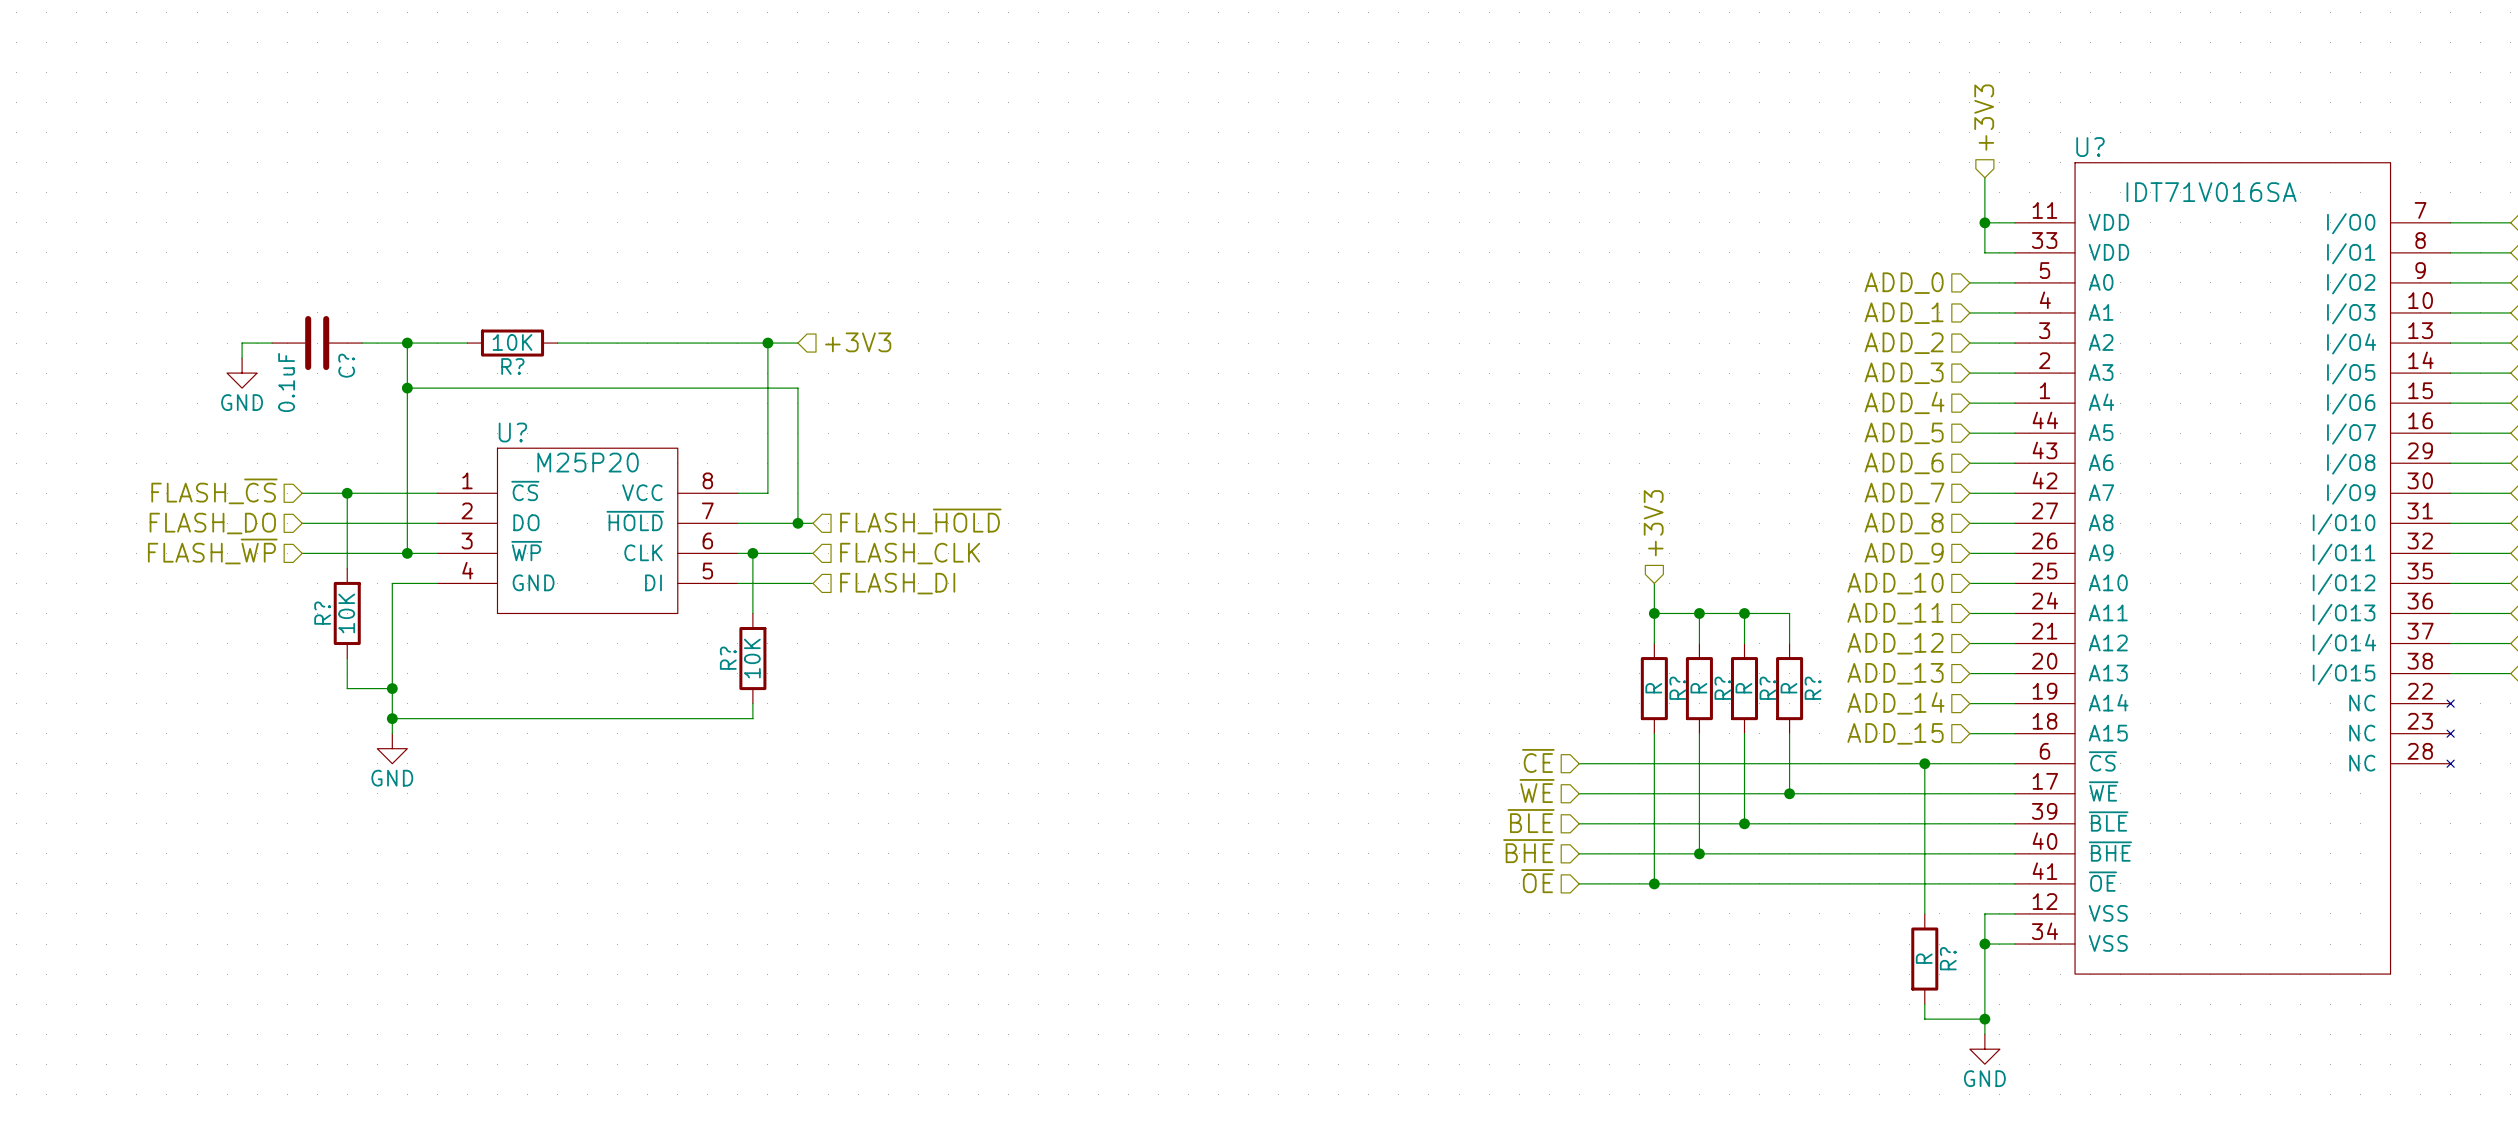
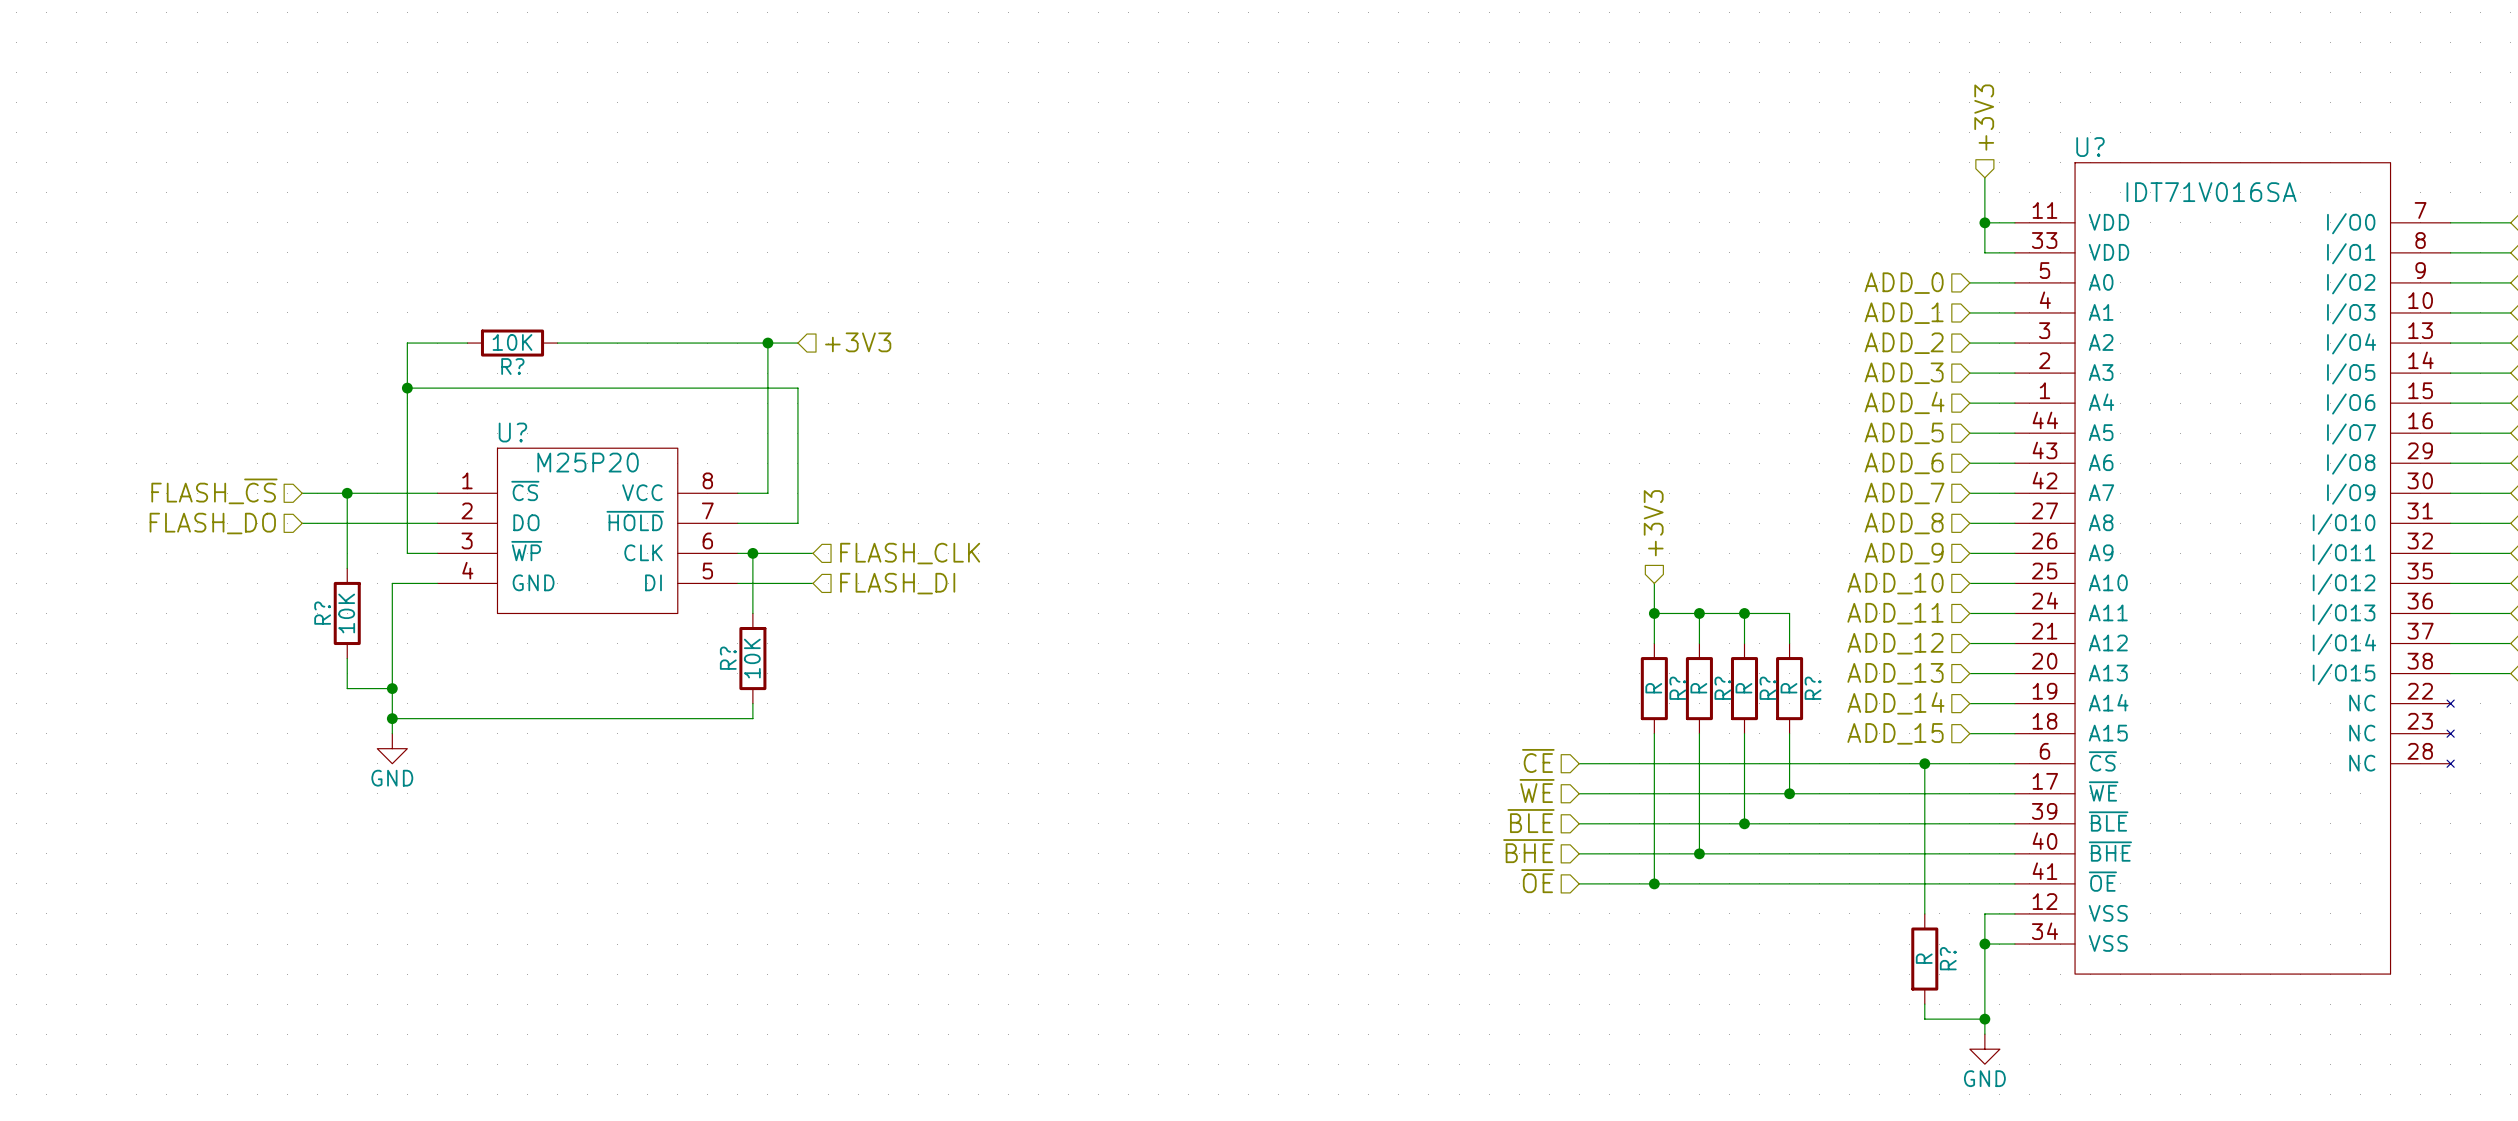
wire: (272, 343) (242, 343) (242, 358) -> none
C?: 0.1uF (317, 343) -> none
wire: (362, 343) (407, 343) -> none
junction: (407, 343) -> none
power symbol: GND (242, 373) -> none
hierarchical label: FLASH_~{HOLD} (920, 521) -> none
wire: (797, 523) (812, 523) -> none
junction: (797, 523) -> none
hierarchical label: FLASH_~{WP} (212, 551) -> none
wire: (302, 553) (407, 553) -> none
junction: (407, 553) -> none

